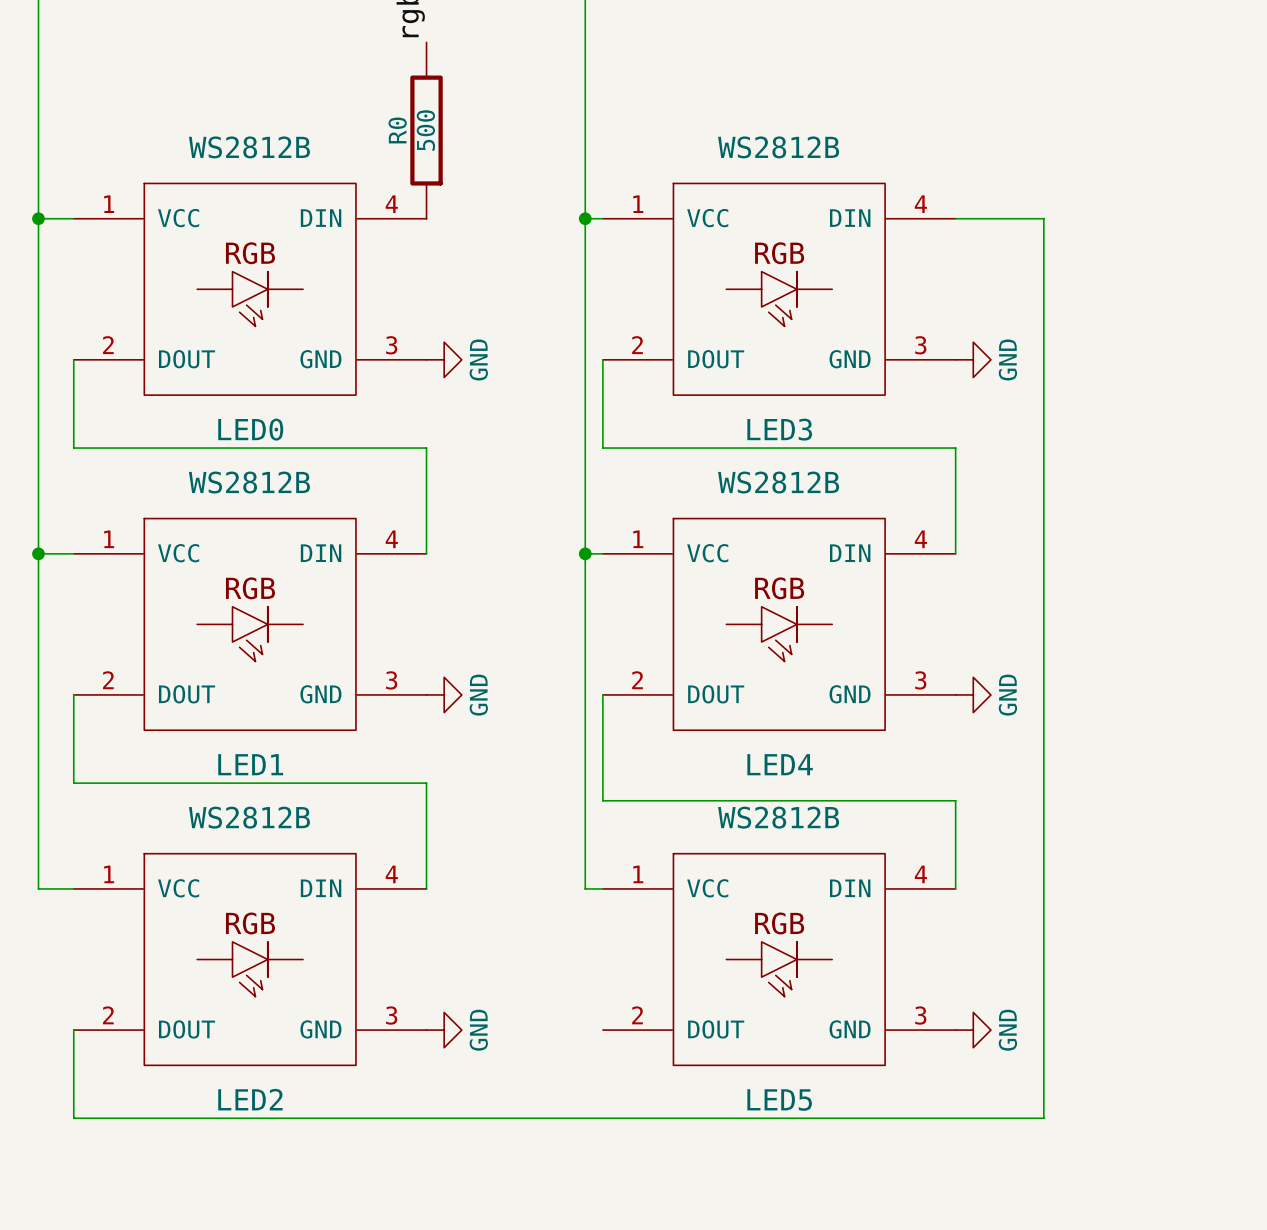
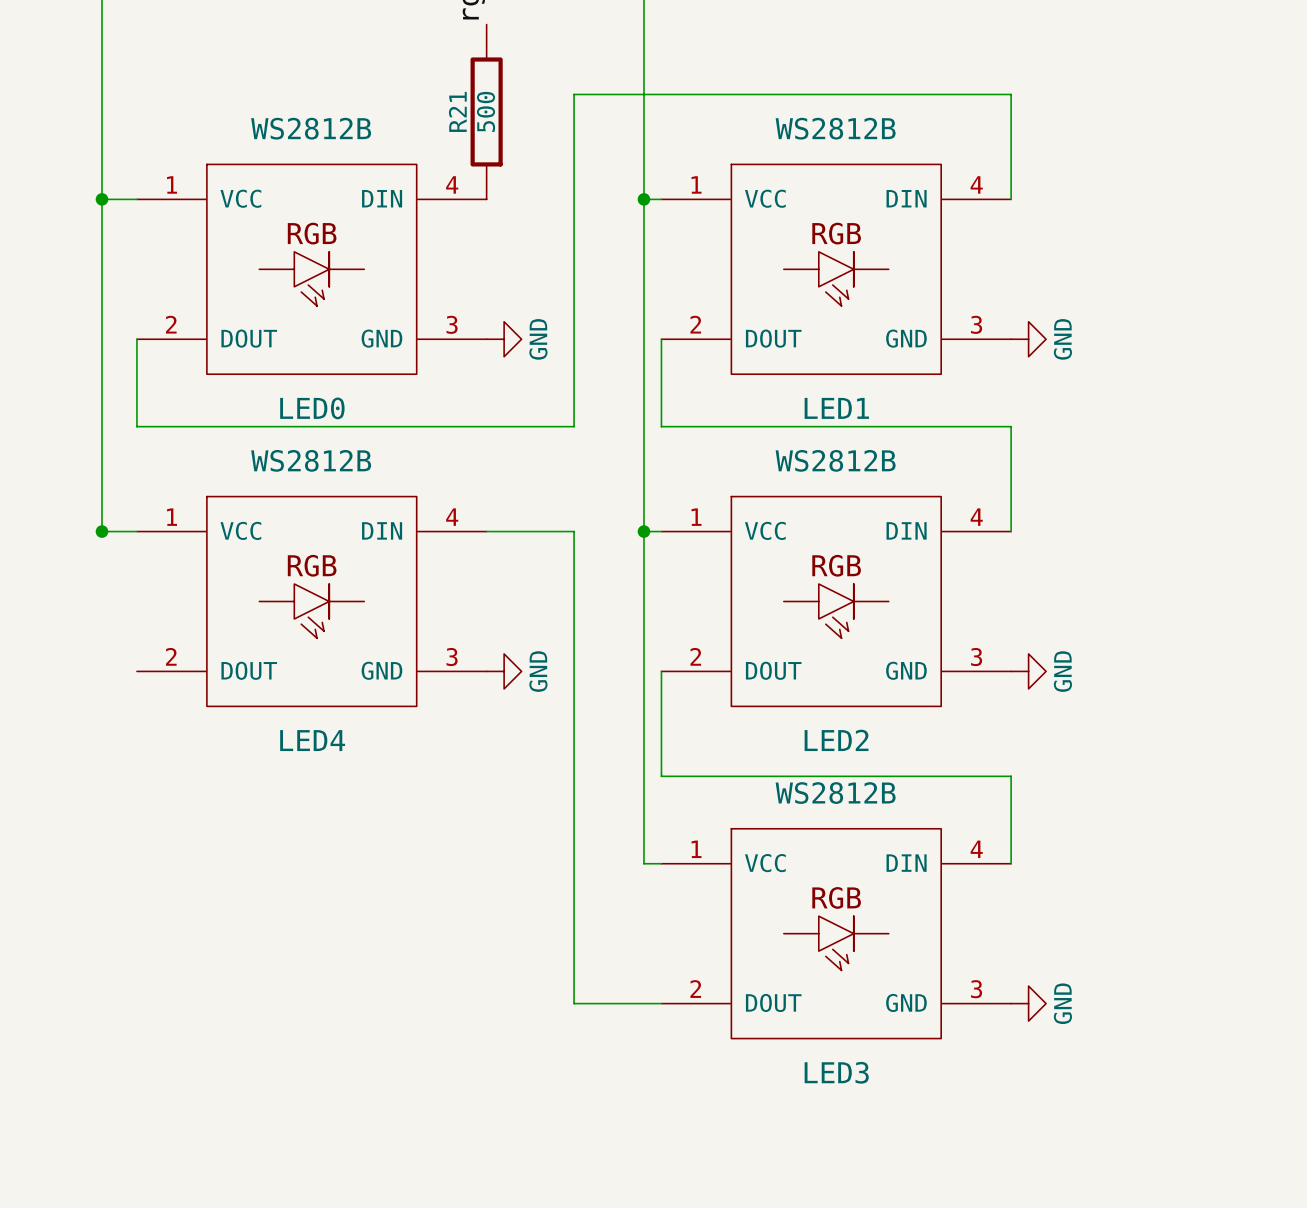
R0 name: R0 (397, 130) -> R21 (457, 111)
wire: (955, 218) (1043, 218) (1043, 1118) (73, 1118) (73, 1030) -> (1011, 199) (1011, 94) (574, 94) (574, 426) (486, 426)
LED3 name: LED3 (779, 429) -> LED1 (836, 408)
wire: (426, 448) (426, 553) -> (661, 1003) (574, 1003) (574, 531) (486, 531)
wire: (38, 553) (38, 888) (73, 888) -> none
wire: (73, 694) (73, 783) (426, 783) (426, 888) -> none
LED1 name: LED1 (250, 764) -> LED4 (312, 740)
LED4 name: LED4 (780, 764) -> LED2 (836, 740)
LED2: WS2812B (250, 959) -> none
power symbol: GND (444, 1030) -> none
LED5 name: LED5 (779, 1100) -> LED3 (836, 1072)

